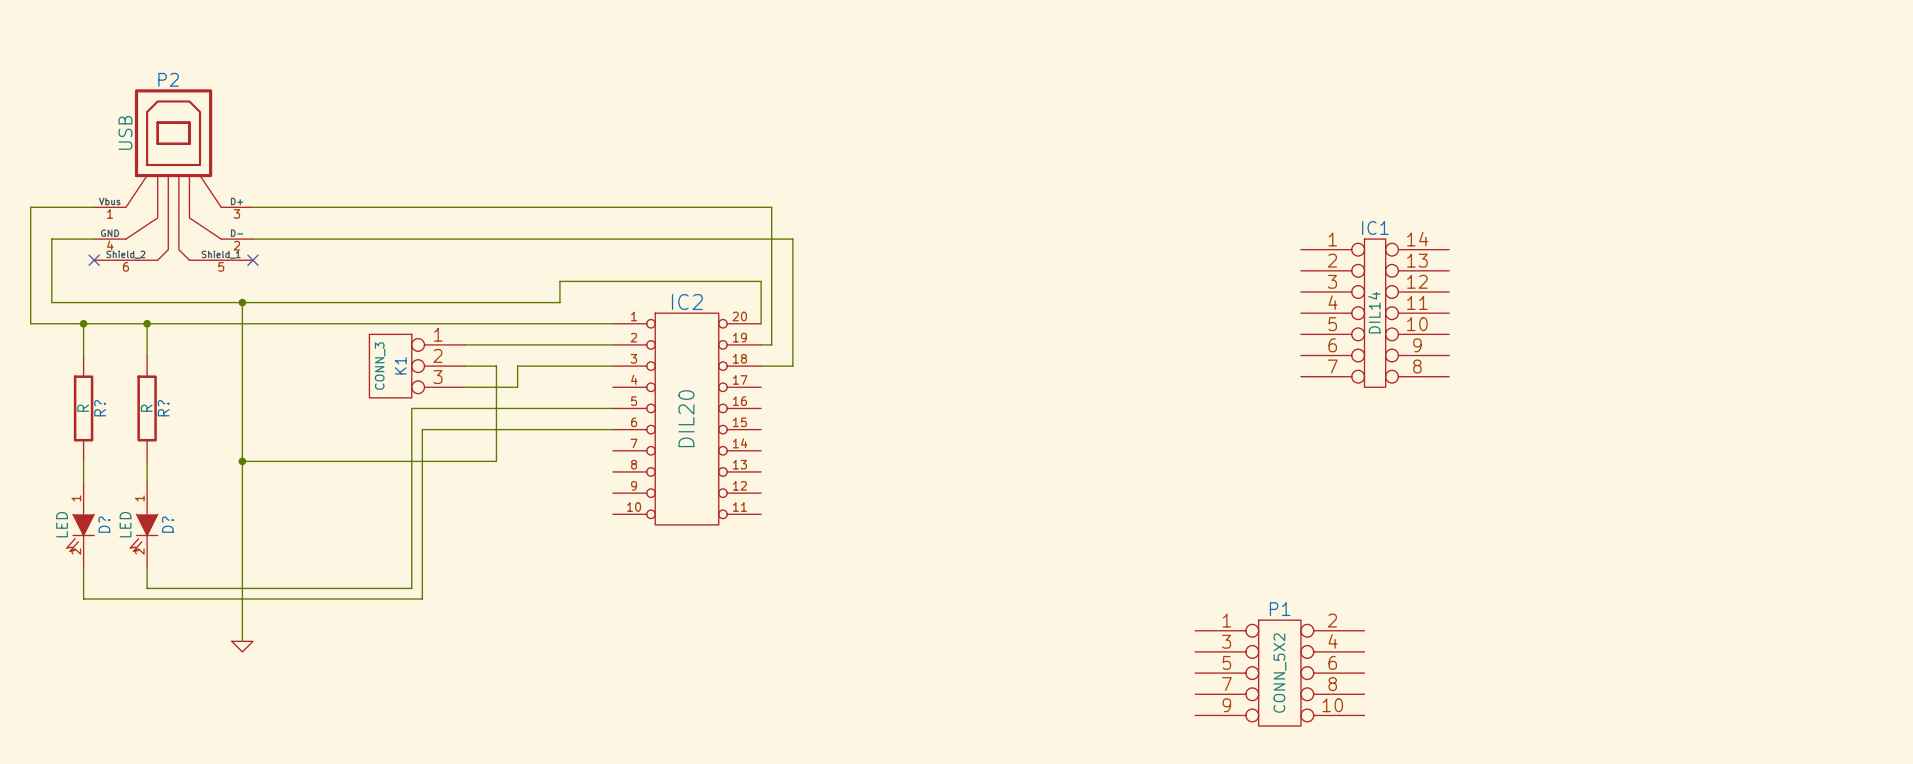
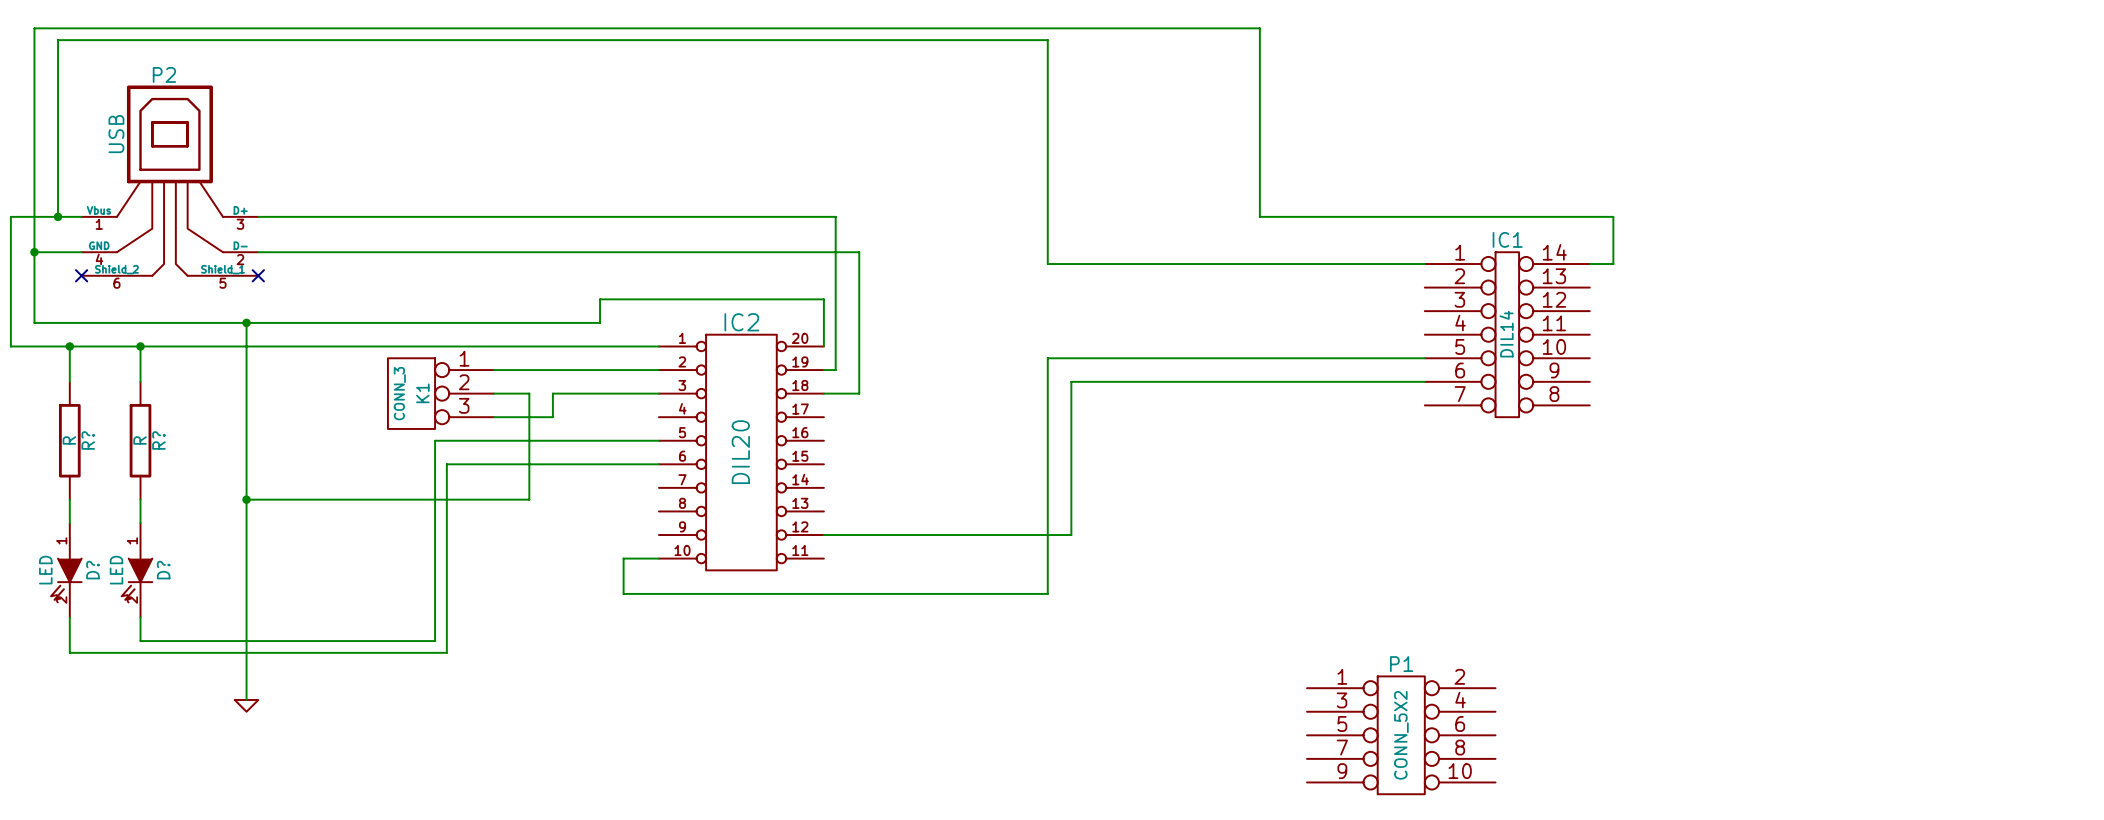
wire: none -> (58, 216) (58, 40) (1047, 40) (1047, 264) (1424, 264)
junction: none -> (58, 216)
wire: none -> (34, 252) (34, 28) (1259, 28) (1259, 216) (1613, 216) (1613, 264) (1589, 264)
junction: none -> (34, 252)
wire: none -> (1424, 358) (1047, 358) (1047, 593) (623, 593) (623, 558) (658, 558)
wire: none -> (1424, 381) (1071, 381) (1071, 535) (823, 535)

